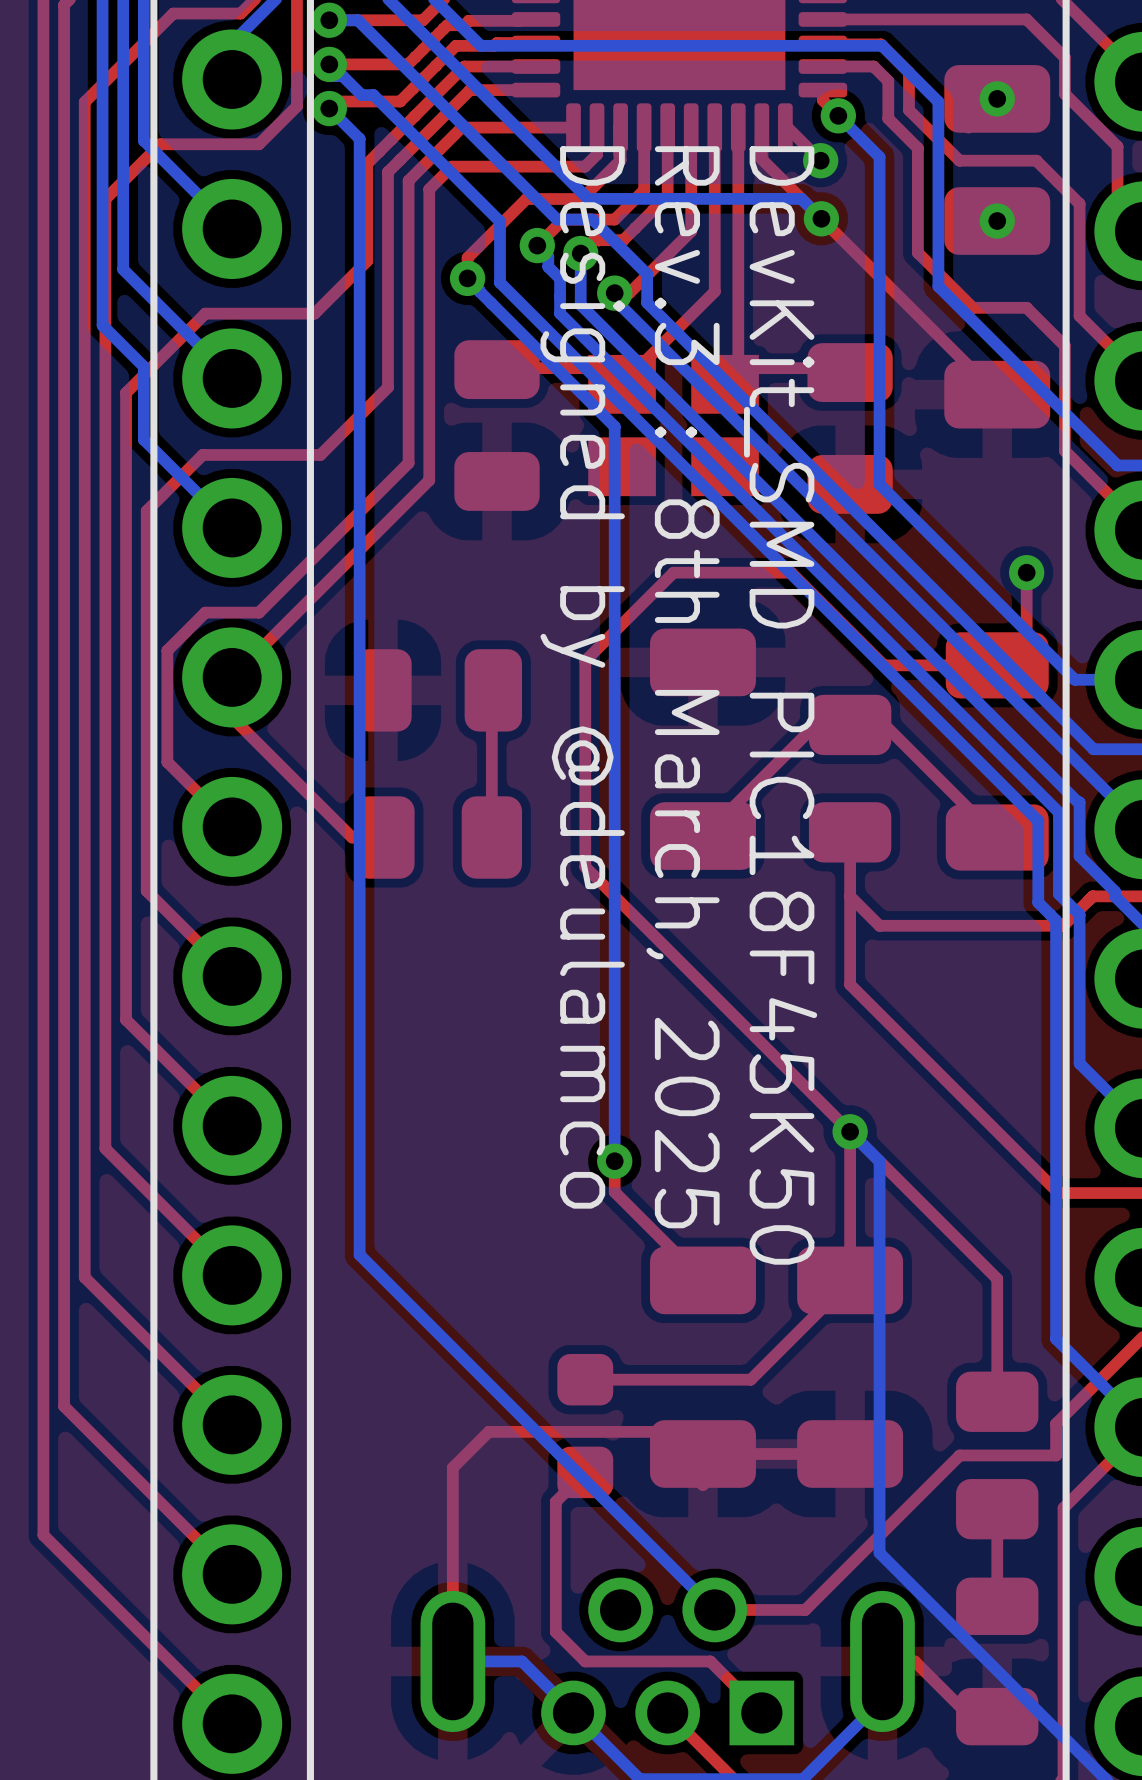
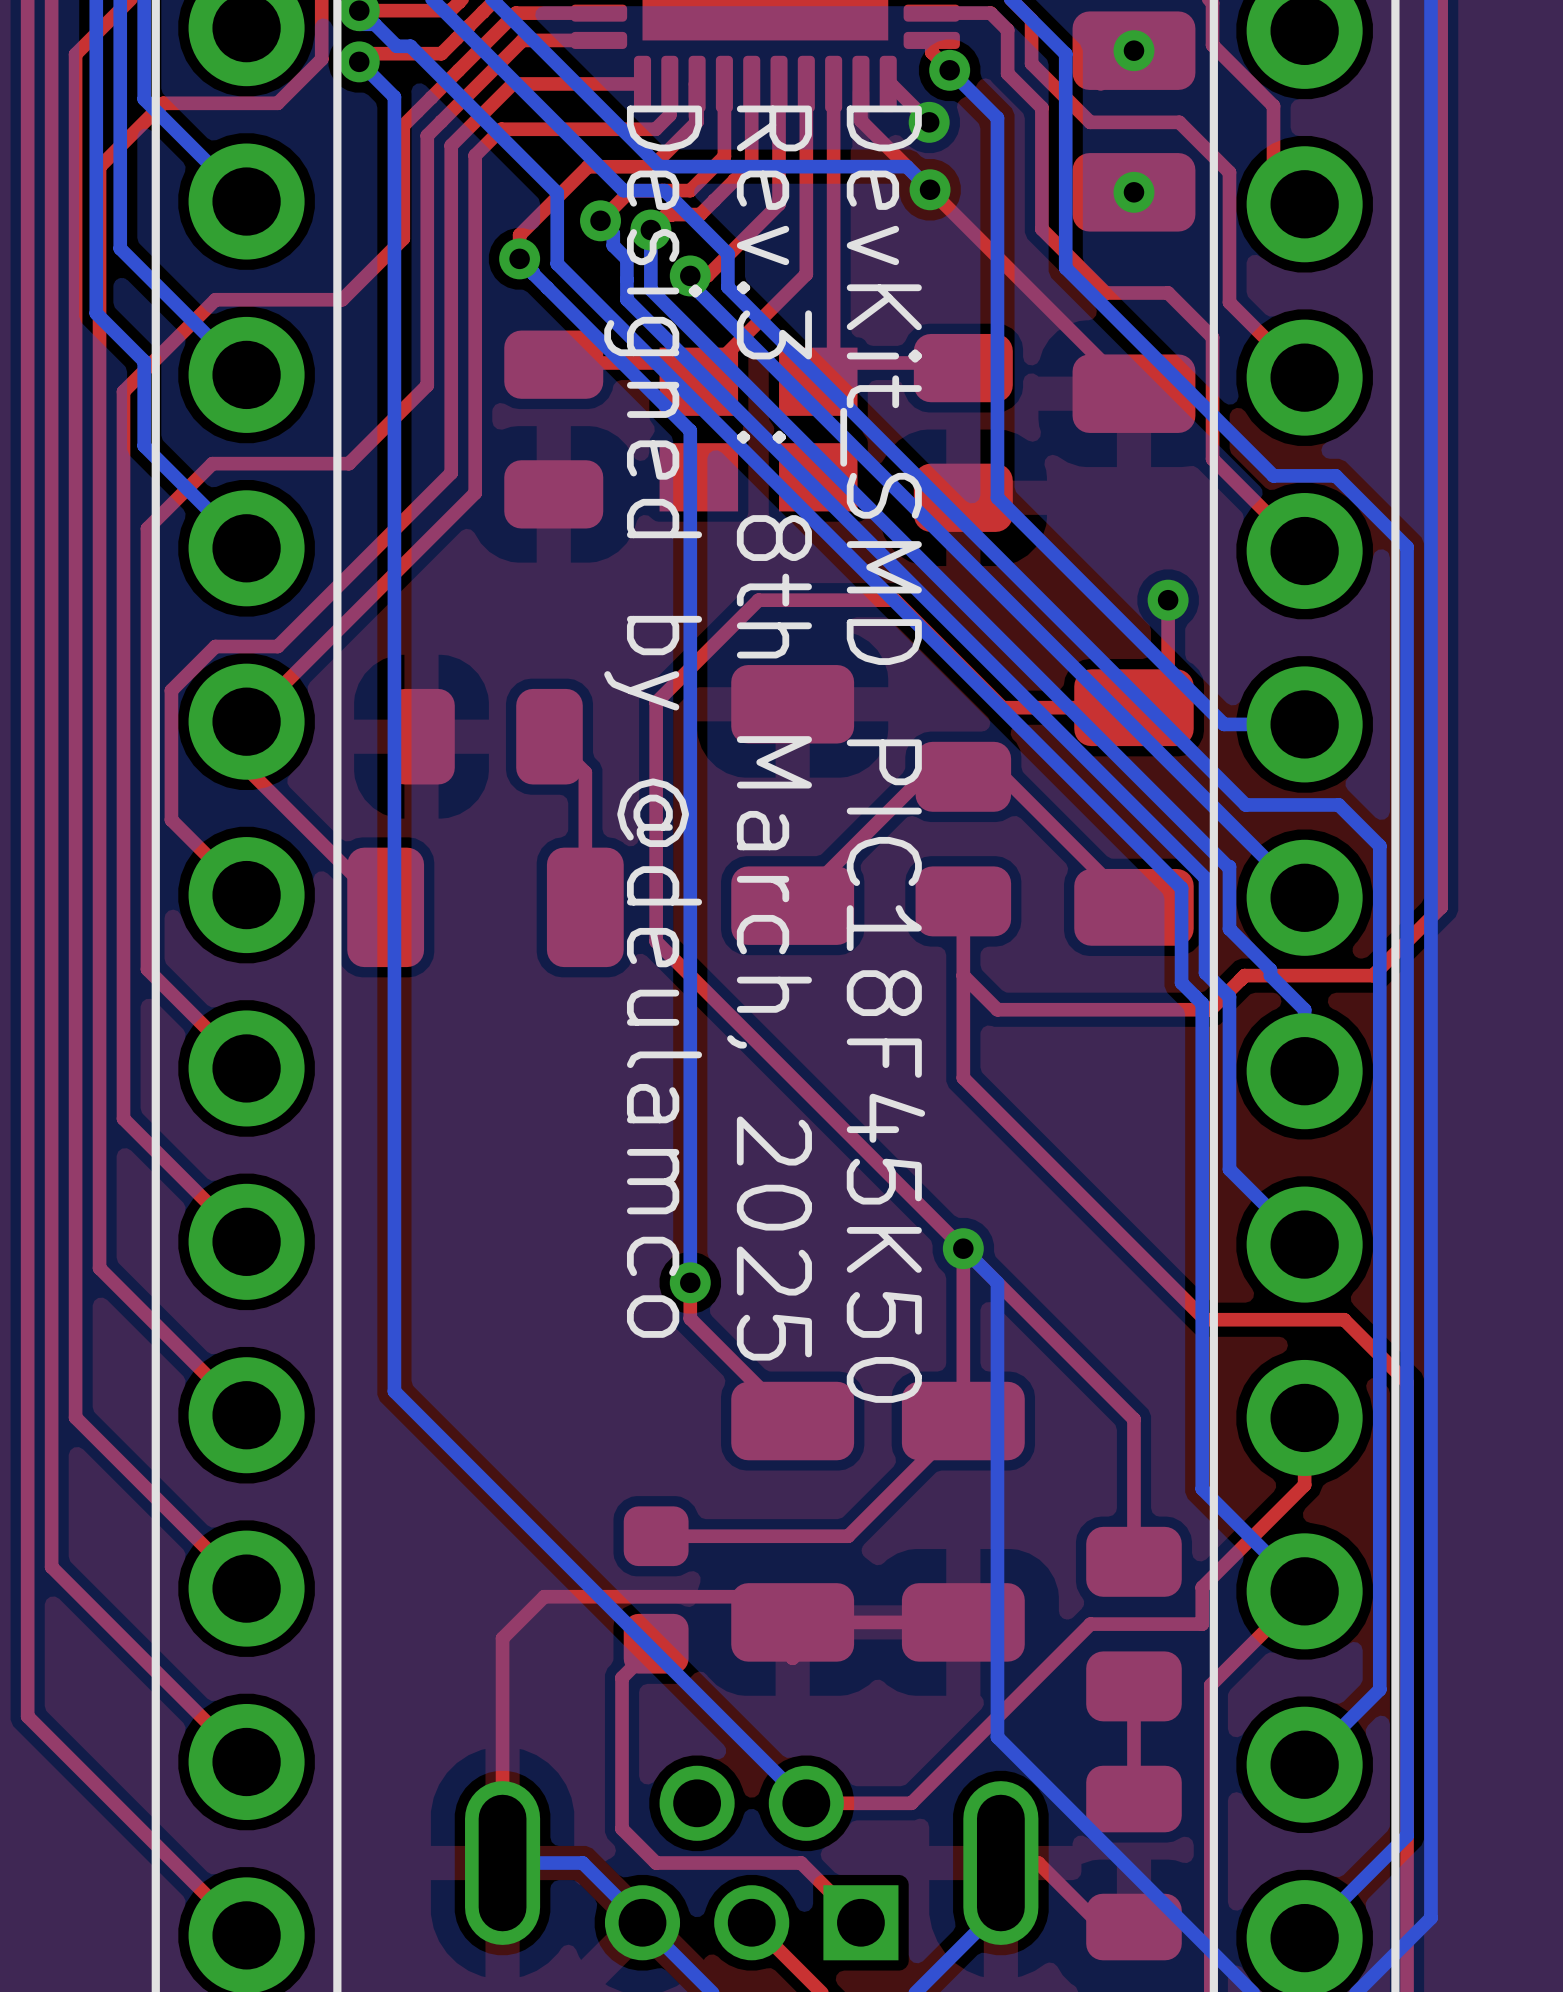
top track: (493, 690) (491, 805) -> (549, 736) (585, 772) (585, 907)
part footprint: [354, 796, 523, 879] -> [347, 847, 624, 968]

